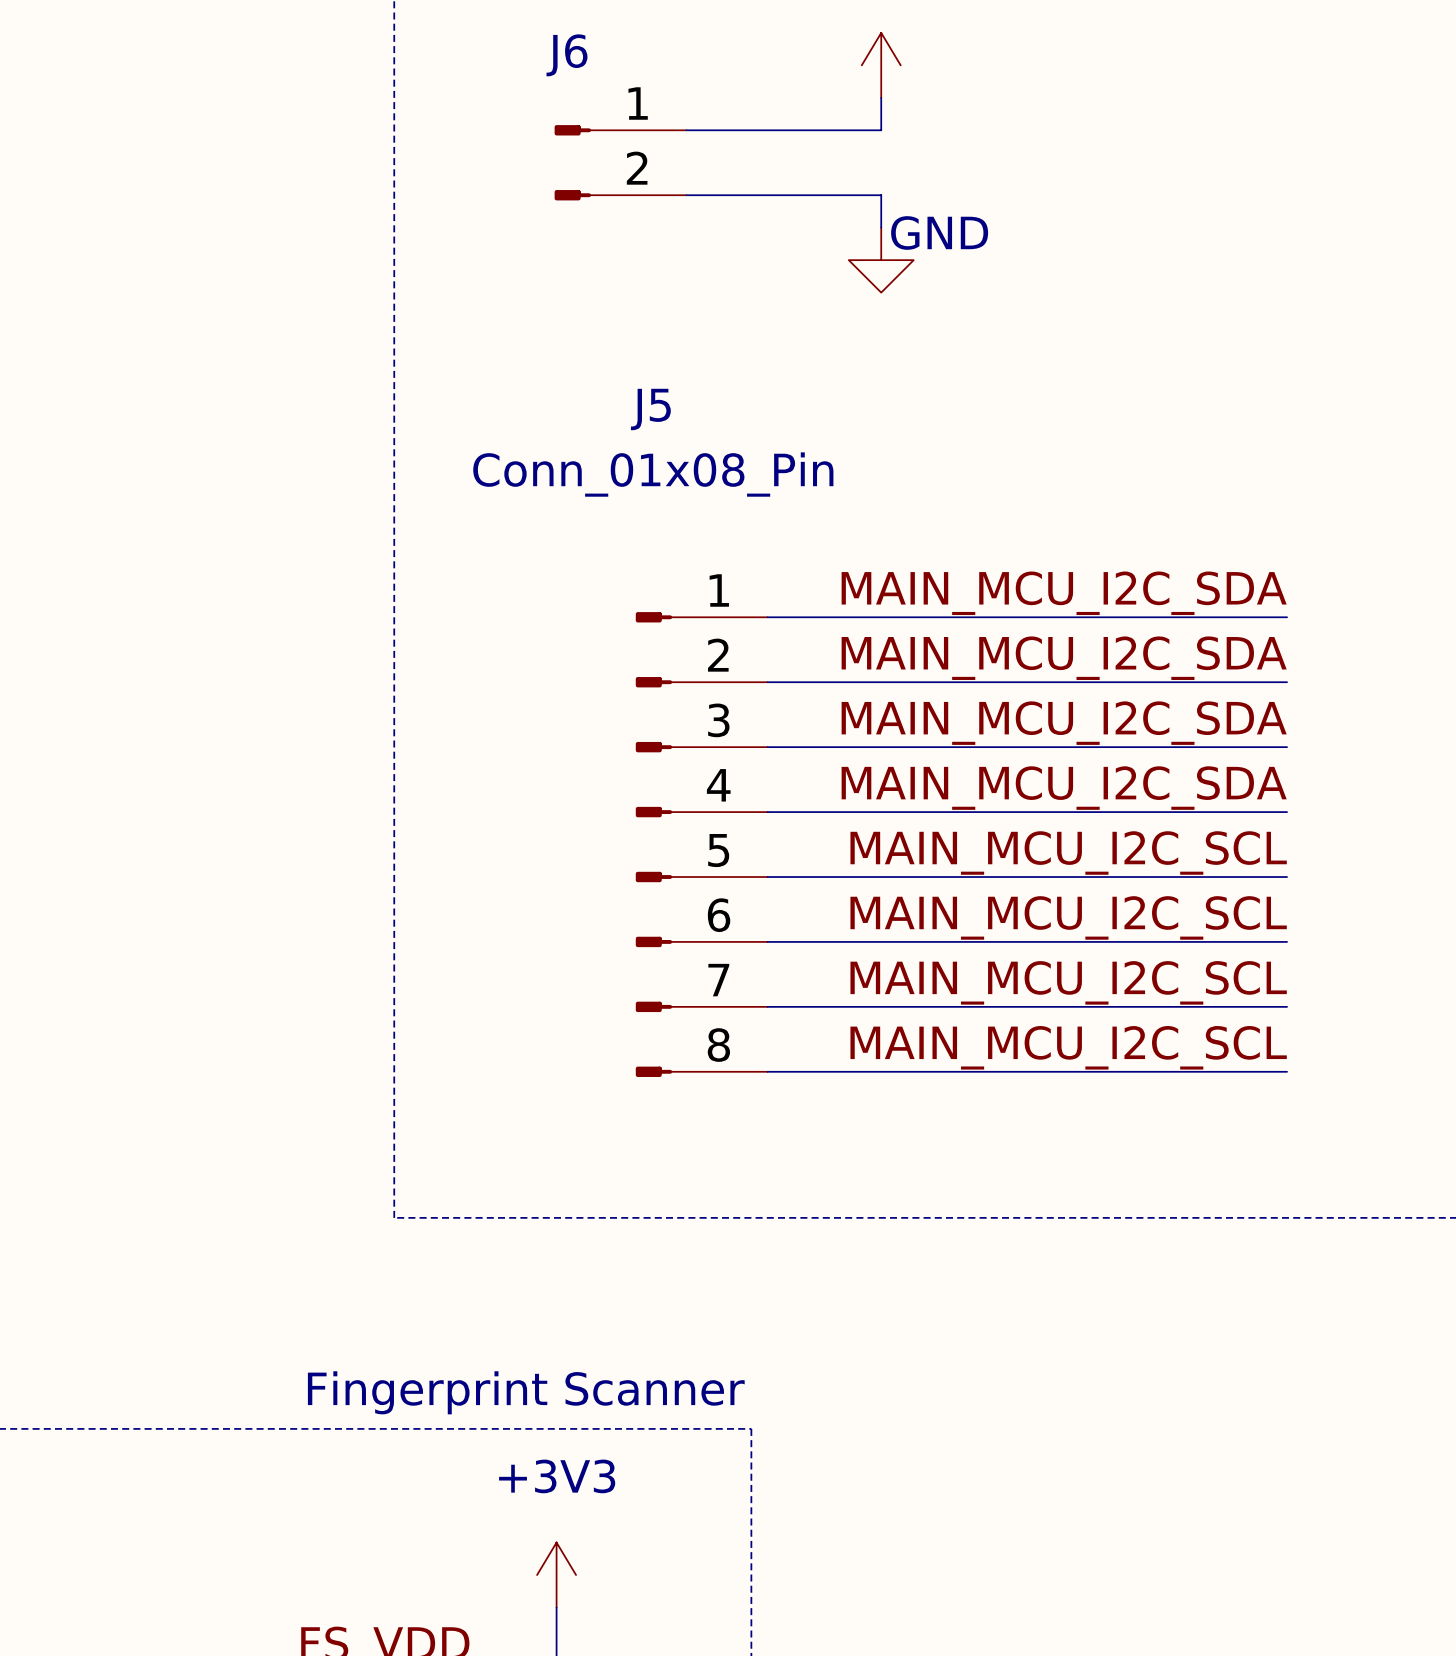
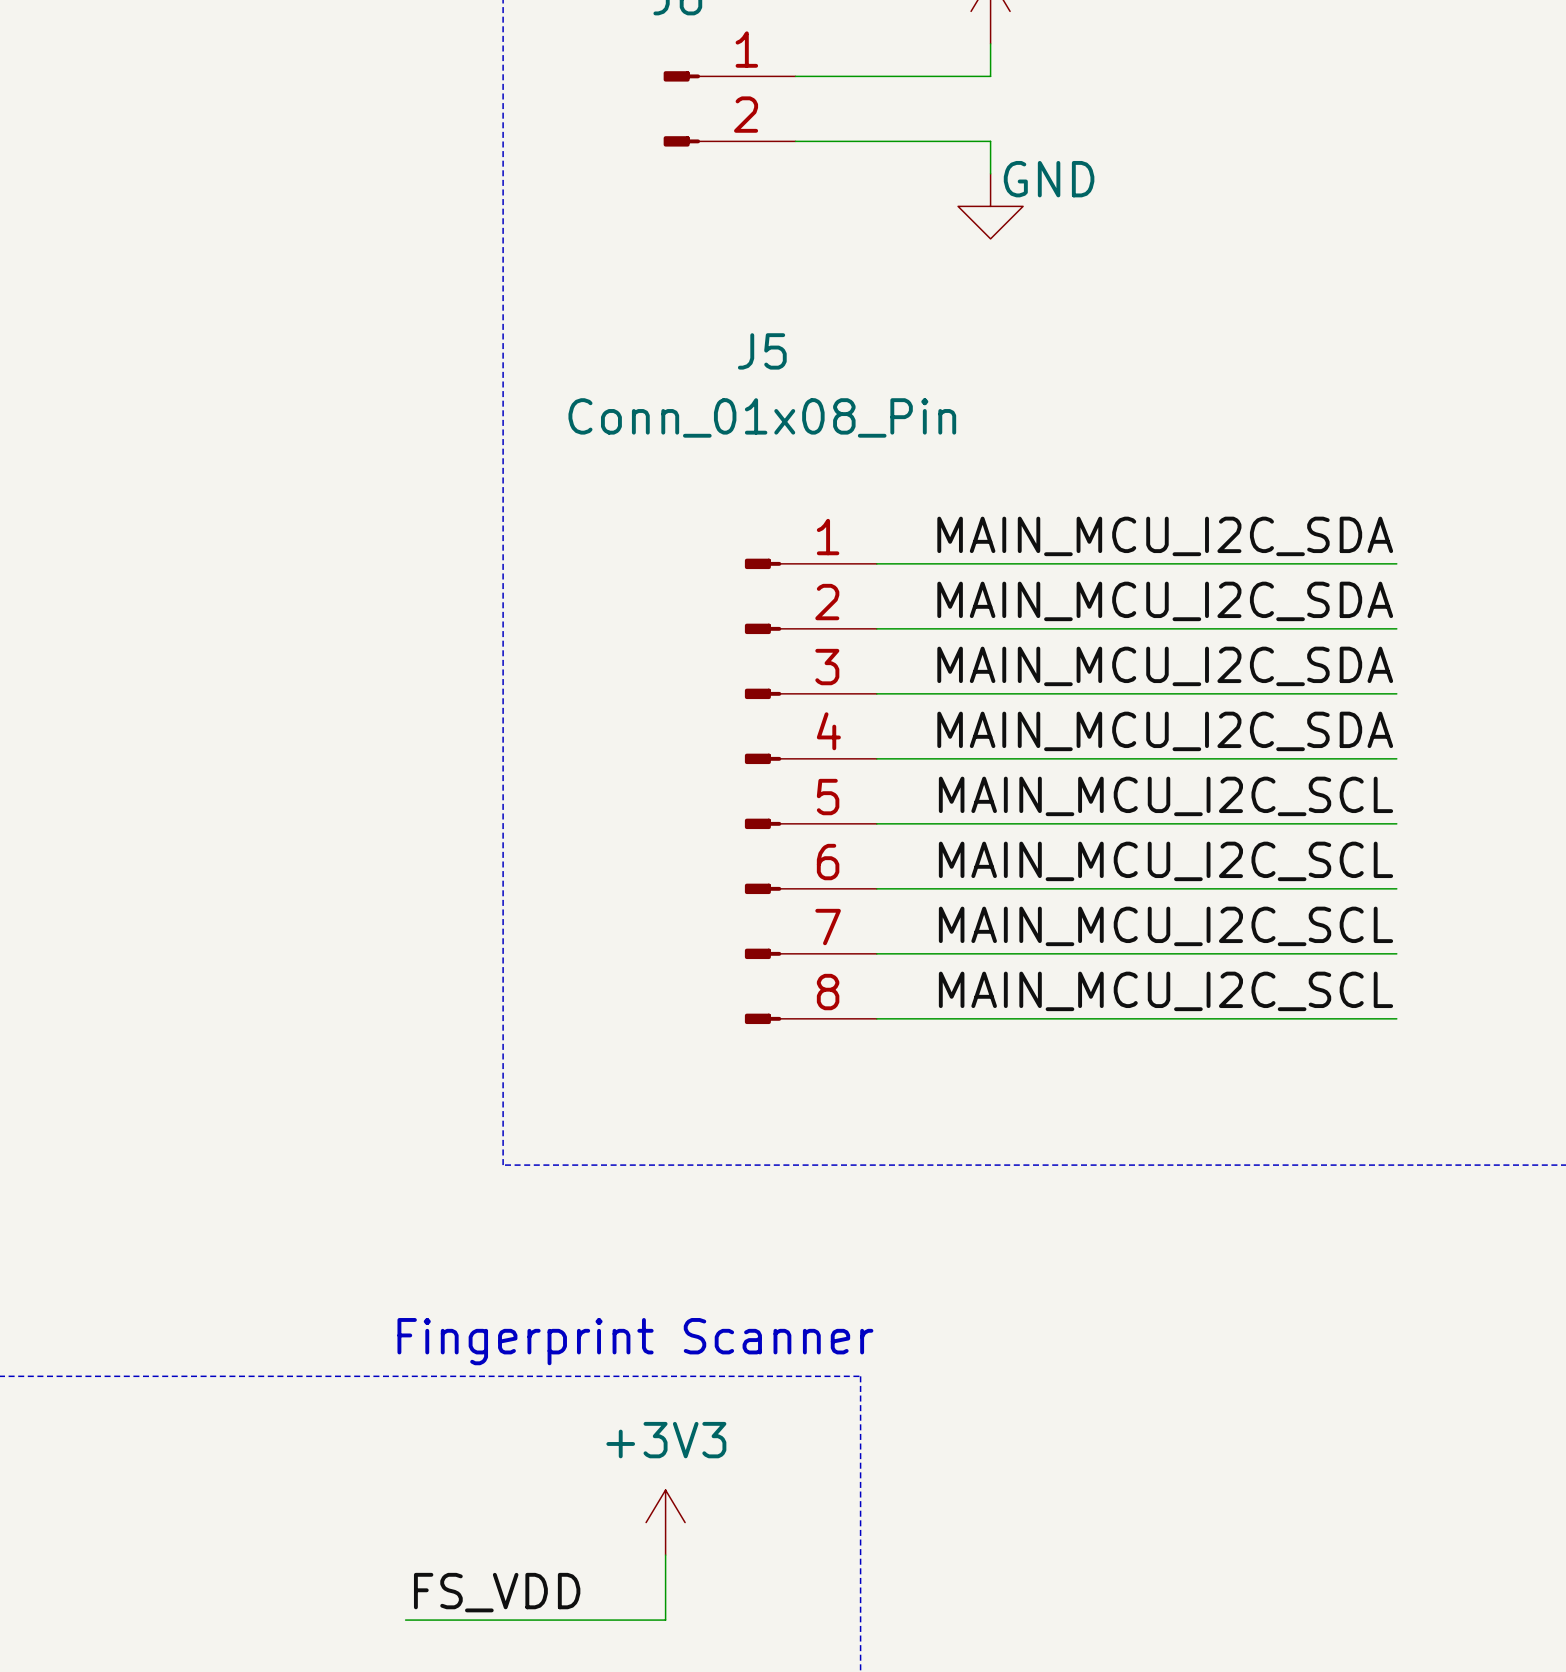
power symbol text position: +3V3 (557, 1476) -> +3V3 (666, 1440)

